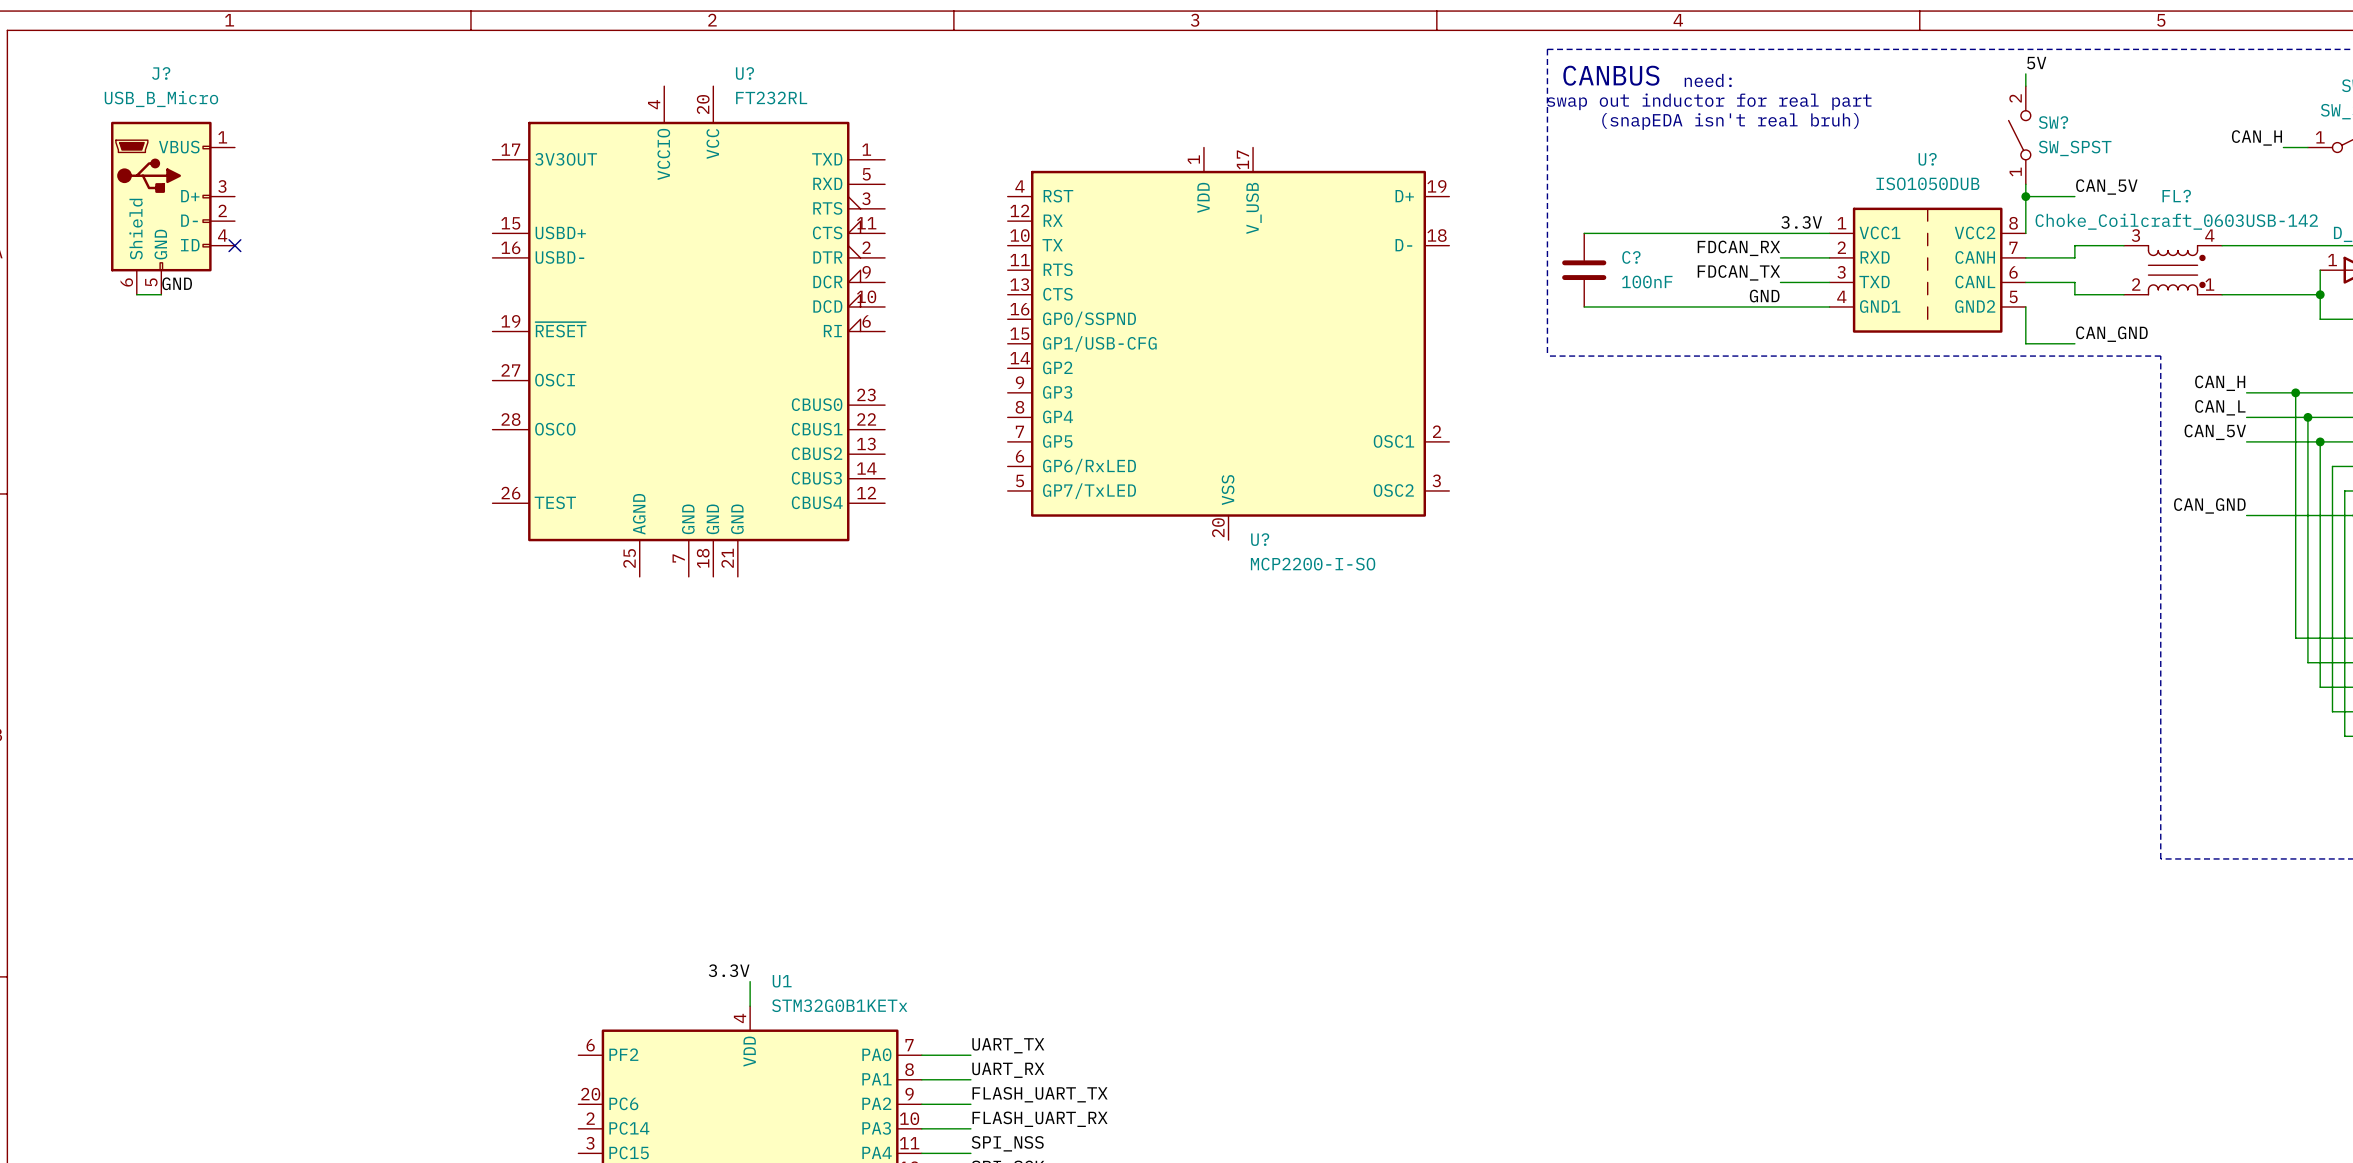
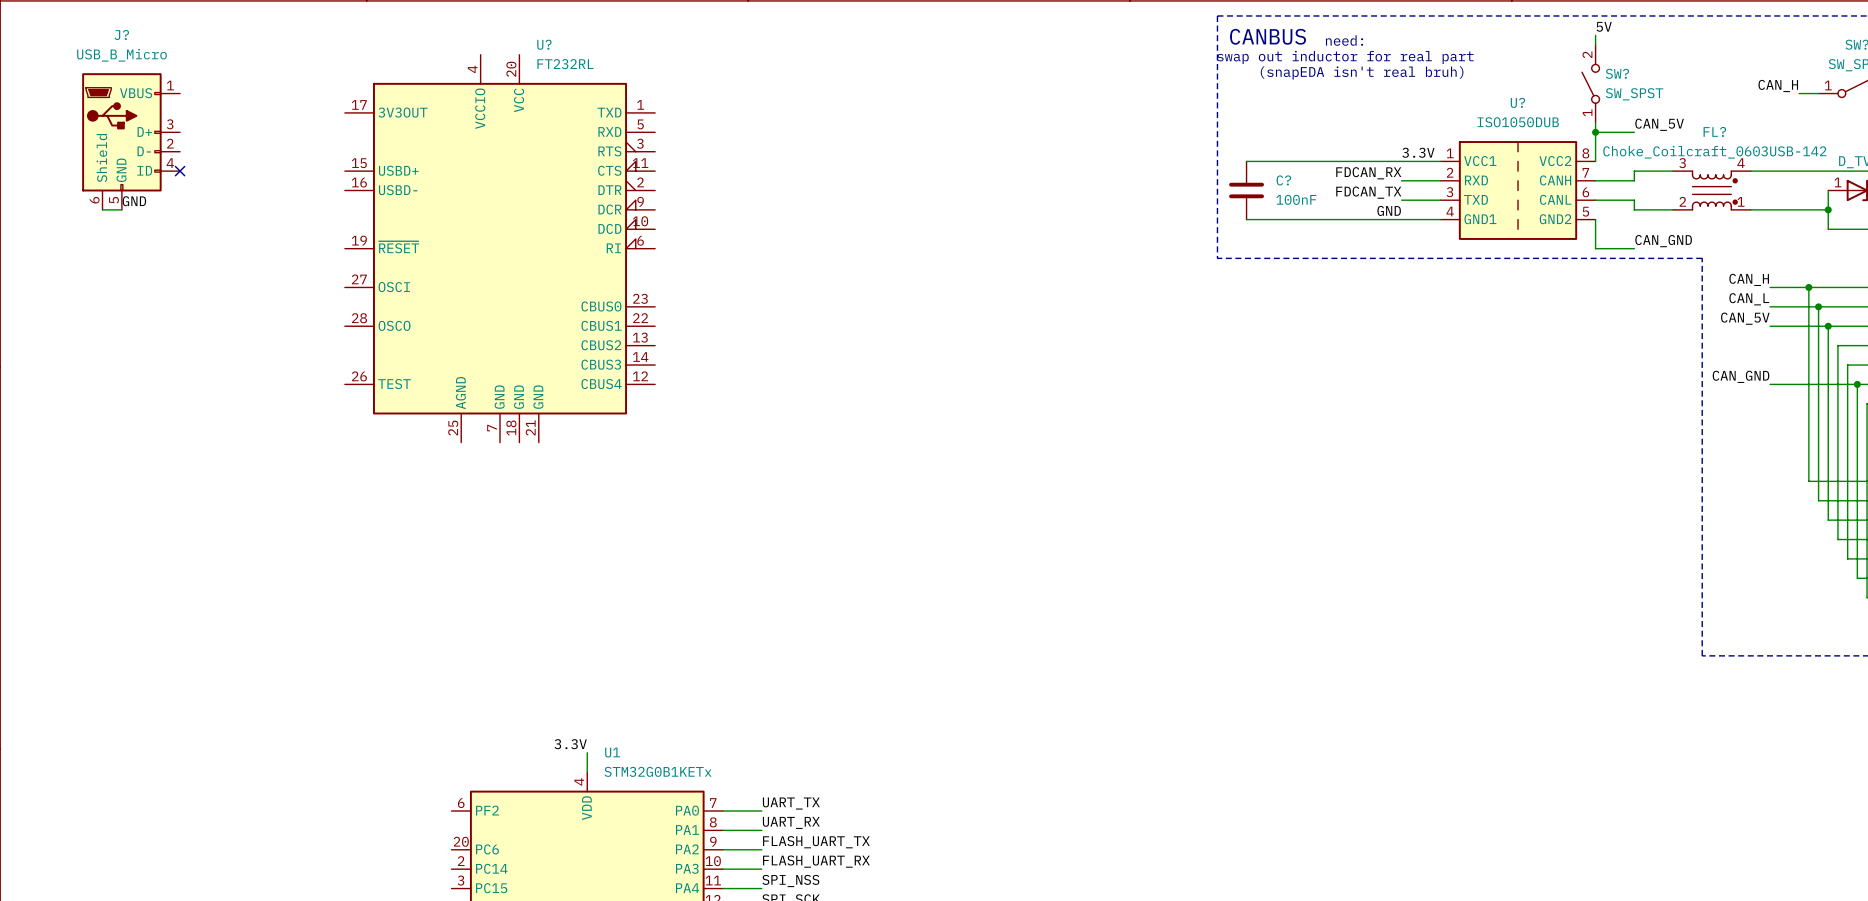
U? position: (688, 331) -> (500, 248)
U?: MCP2200-I-SO (1228, 343) -> none

